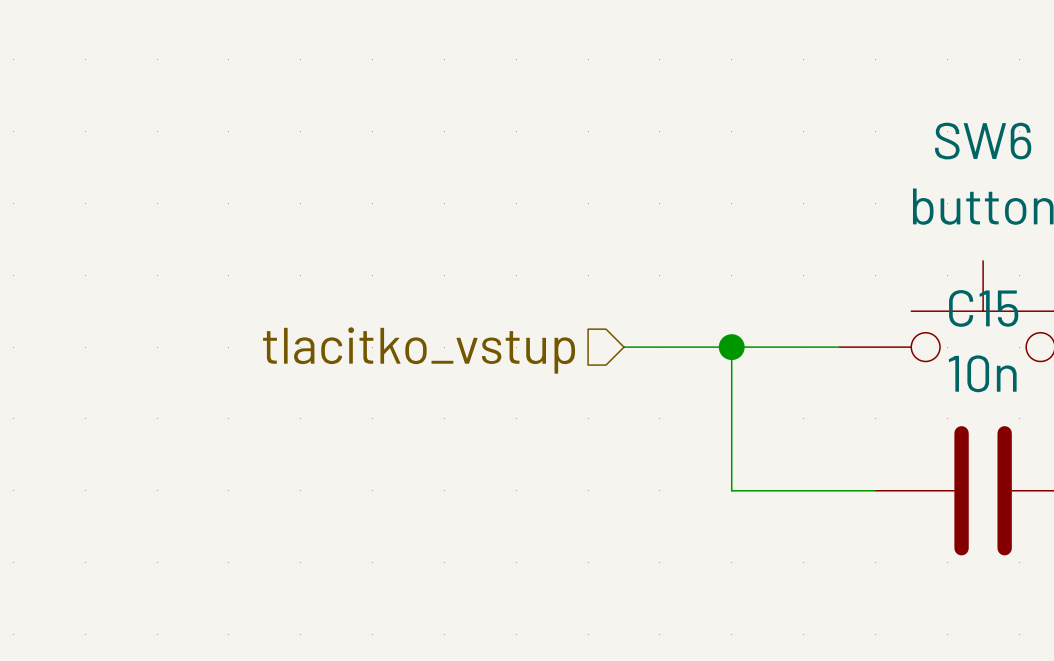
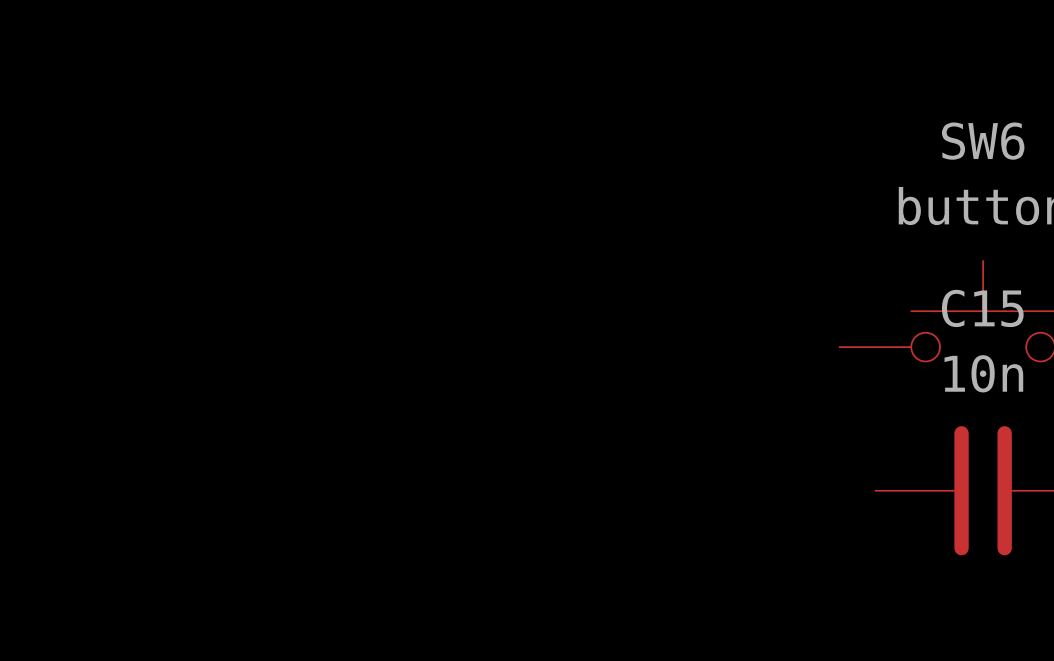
wire: (623, 347) (839, 347) -> none
wire: (731, 347) (731, 490) (875, 490) -> none
junction: (731, 347) -> none
hierarchical label: tlacitko_vstup (419, 350) -> none

